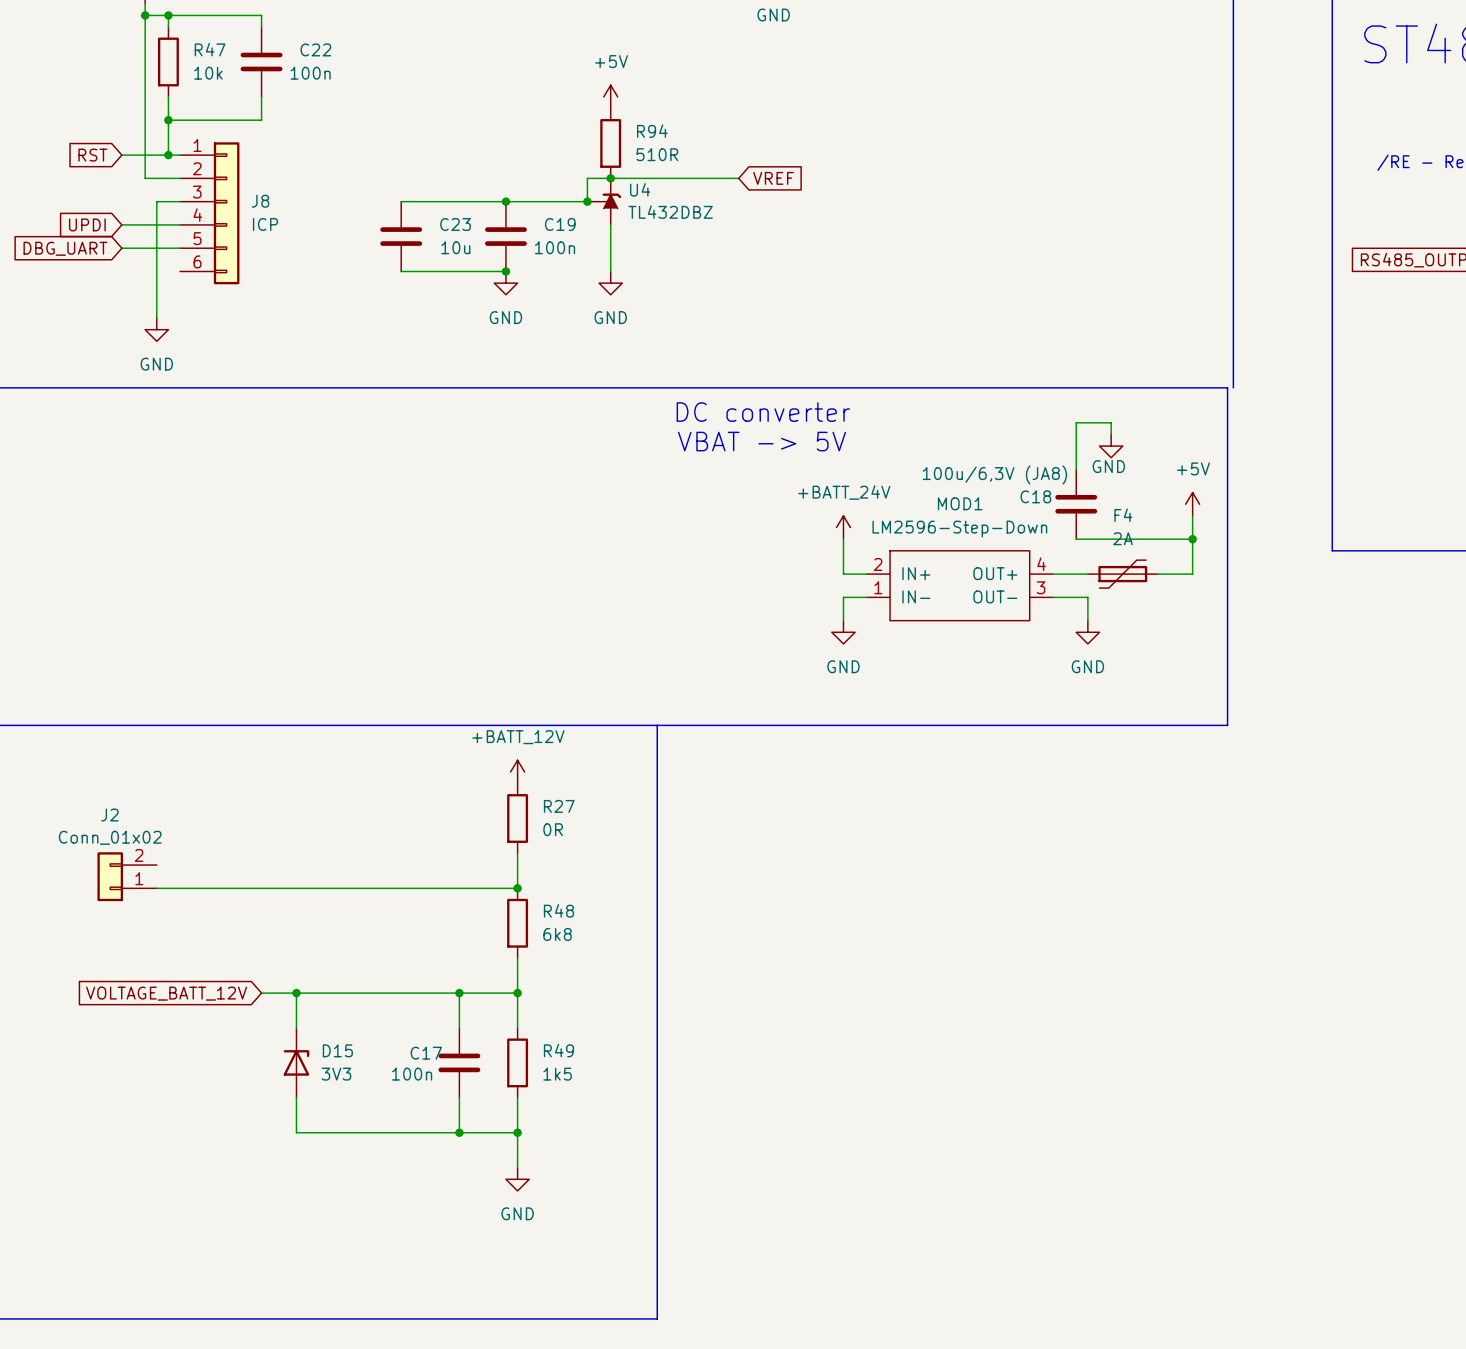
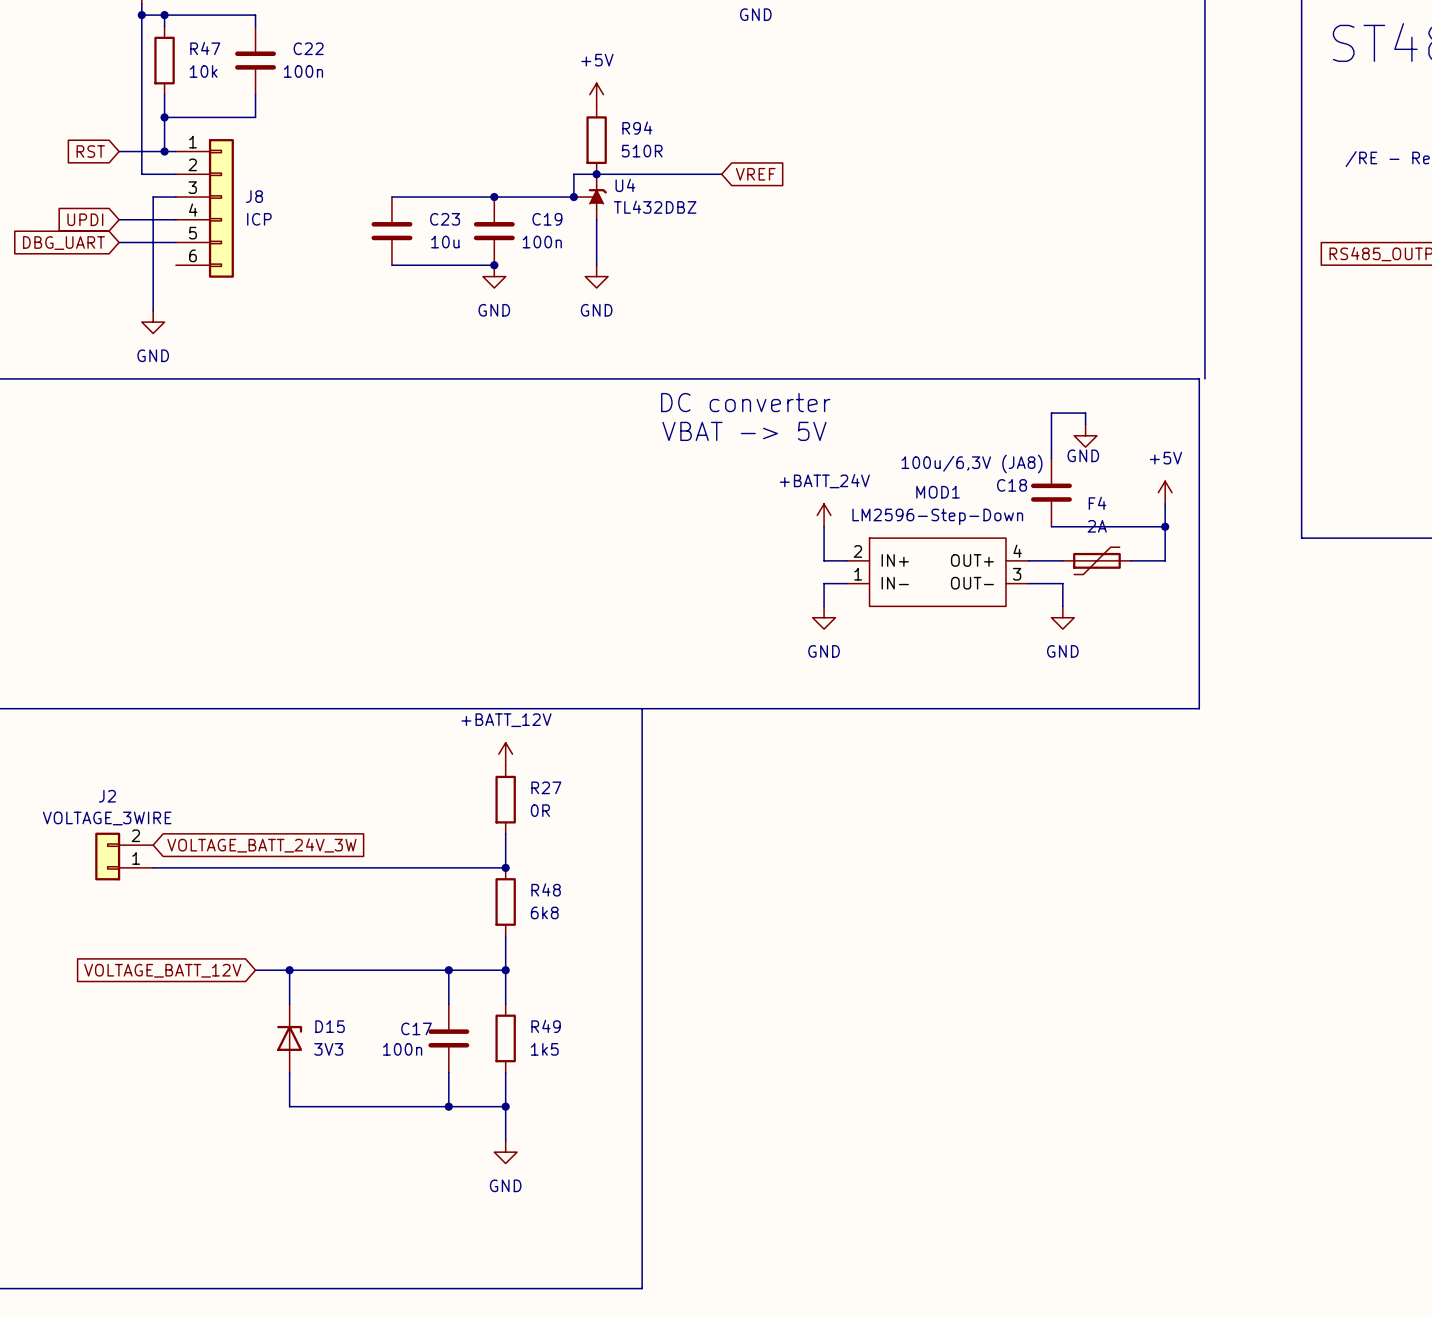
J2 value: Conn_01x02 (110, 837) -> VOLTAGE_3WIRE (107, 818)
global label: none -> VOLTAGE_BATT_24V_3W (261, 845)

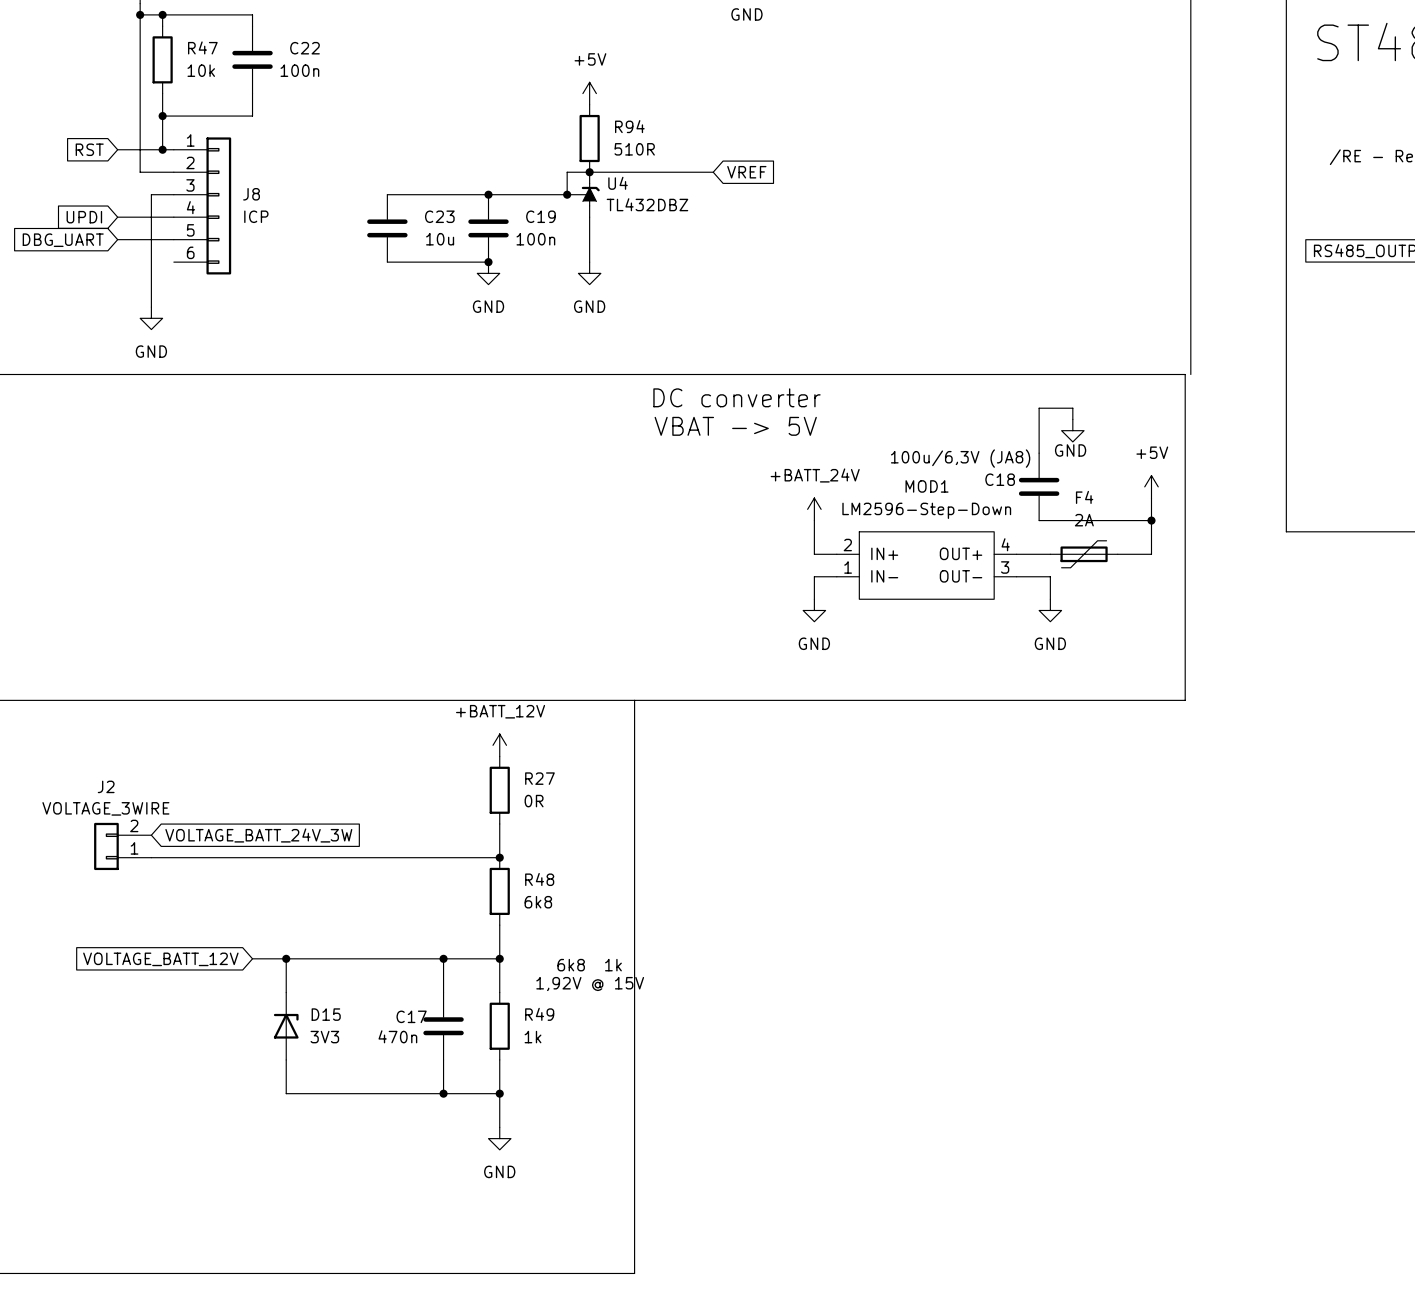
text: none -> 6k8 1k (589, 965)
text: none -> 1,92V @ 15V (590, 984)
C17 value: 100n (402, 1049) -> 470n (397, 1036)
R49 value: 1k5 (544, 1049) -> 1k (533, 1037)

